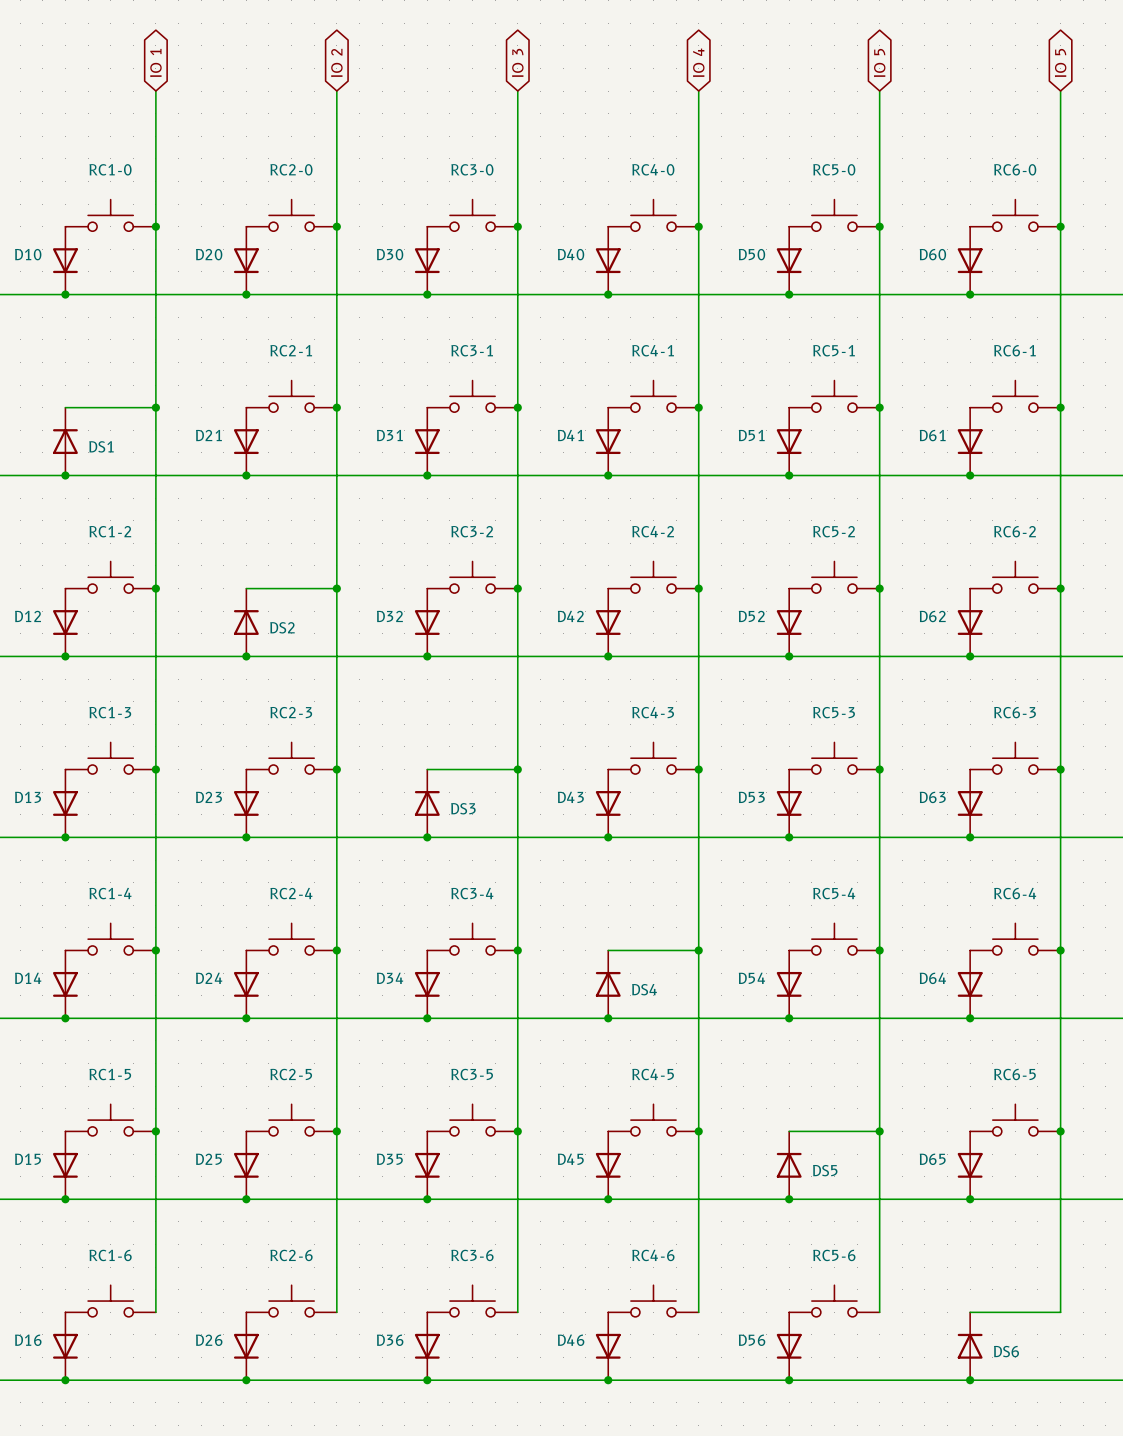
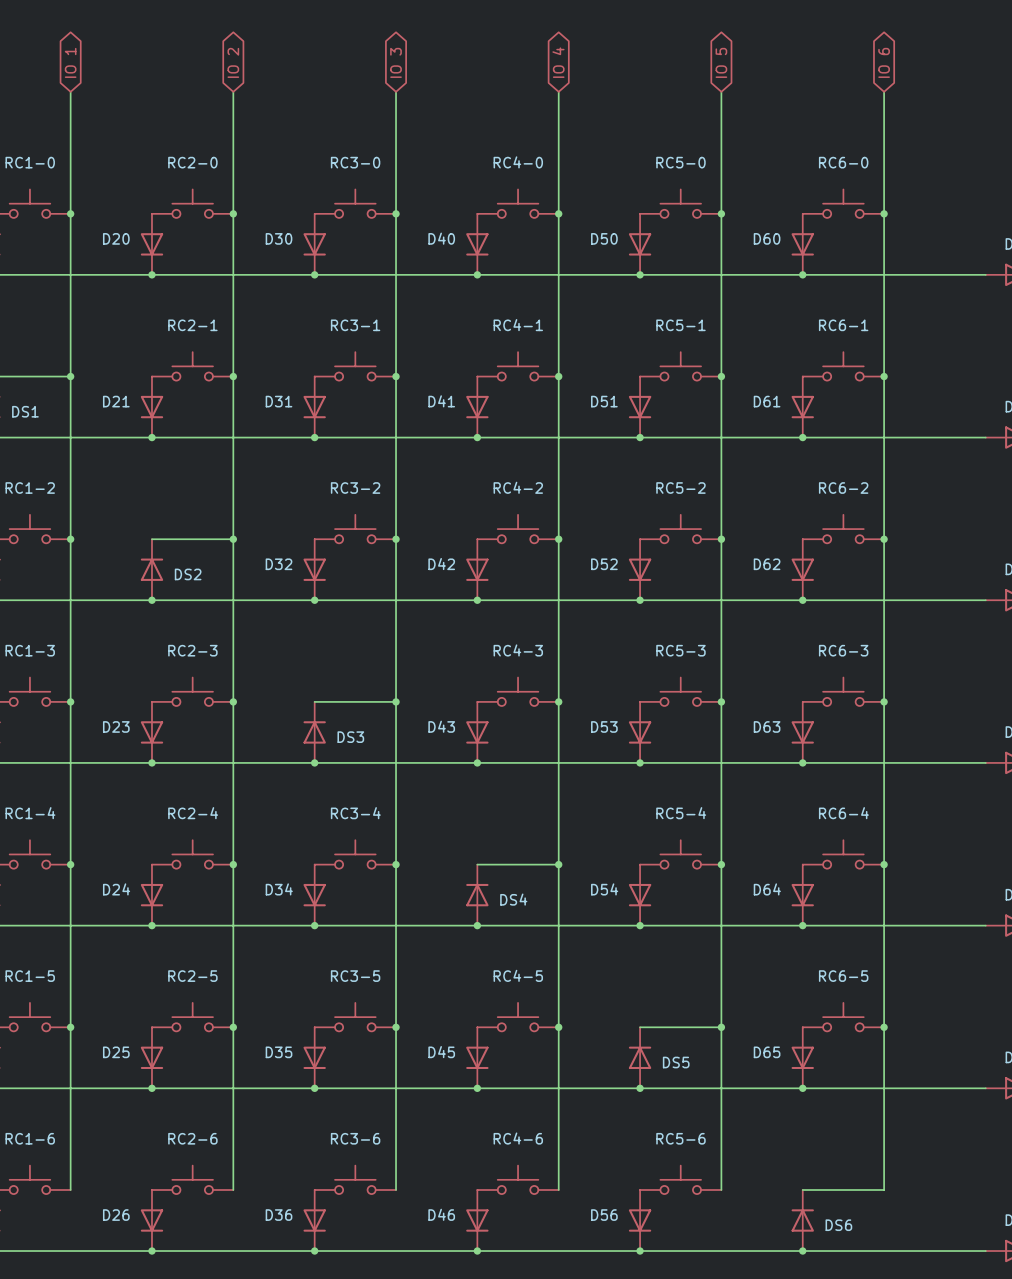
global label: IO 5 (1060, 62) -> IO 6 (884, 62)

